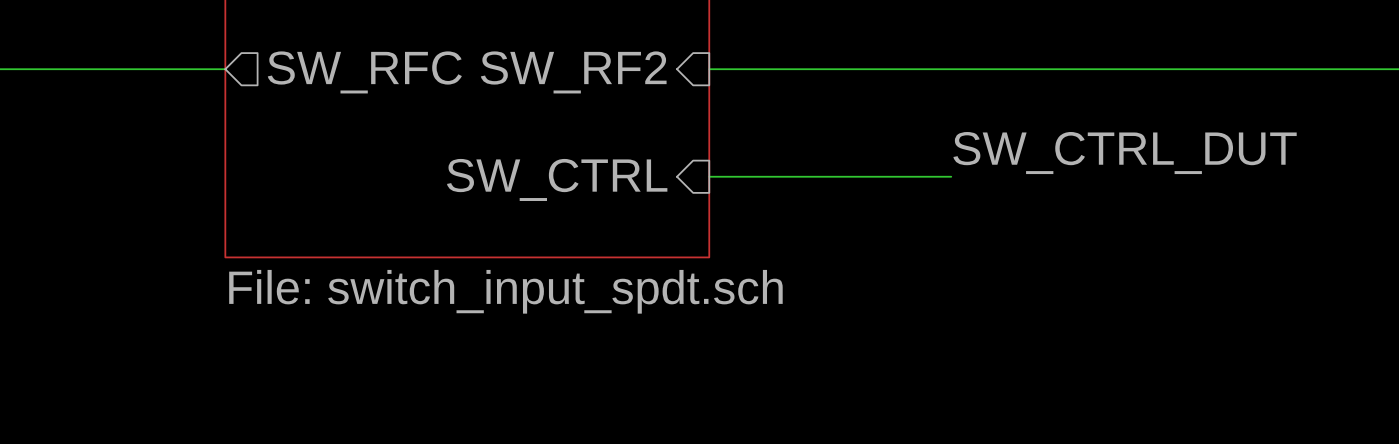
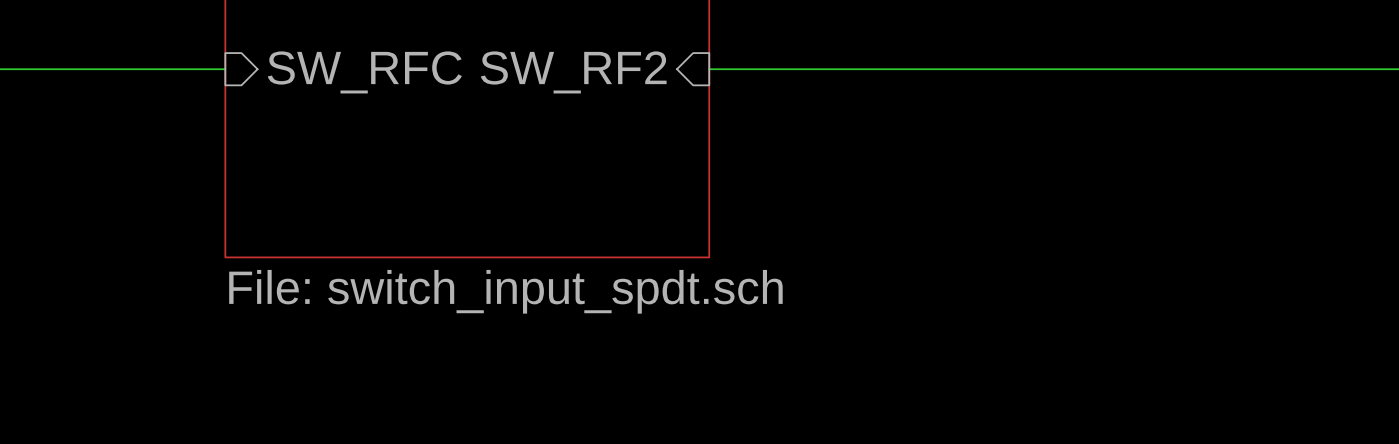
sheet pin shape: output (364, 72) -> input (364, 72)
label: SW_CTRL_DUT (1125, 153) -> none
wire: (709, 176) (951, 176) -> none
sheet pin: SW_CTRL (557, 179) -> none

